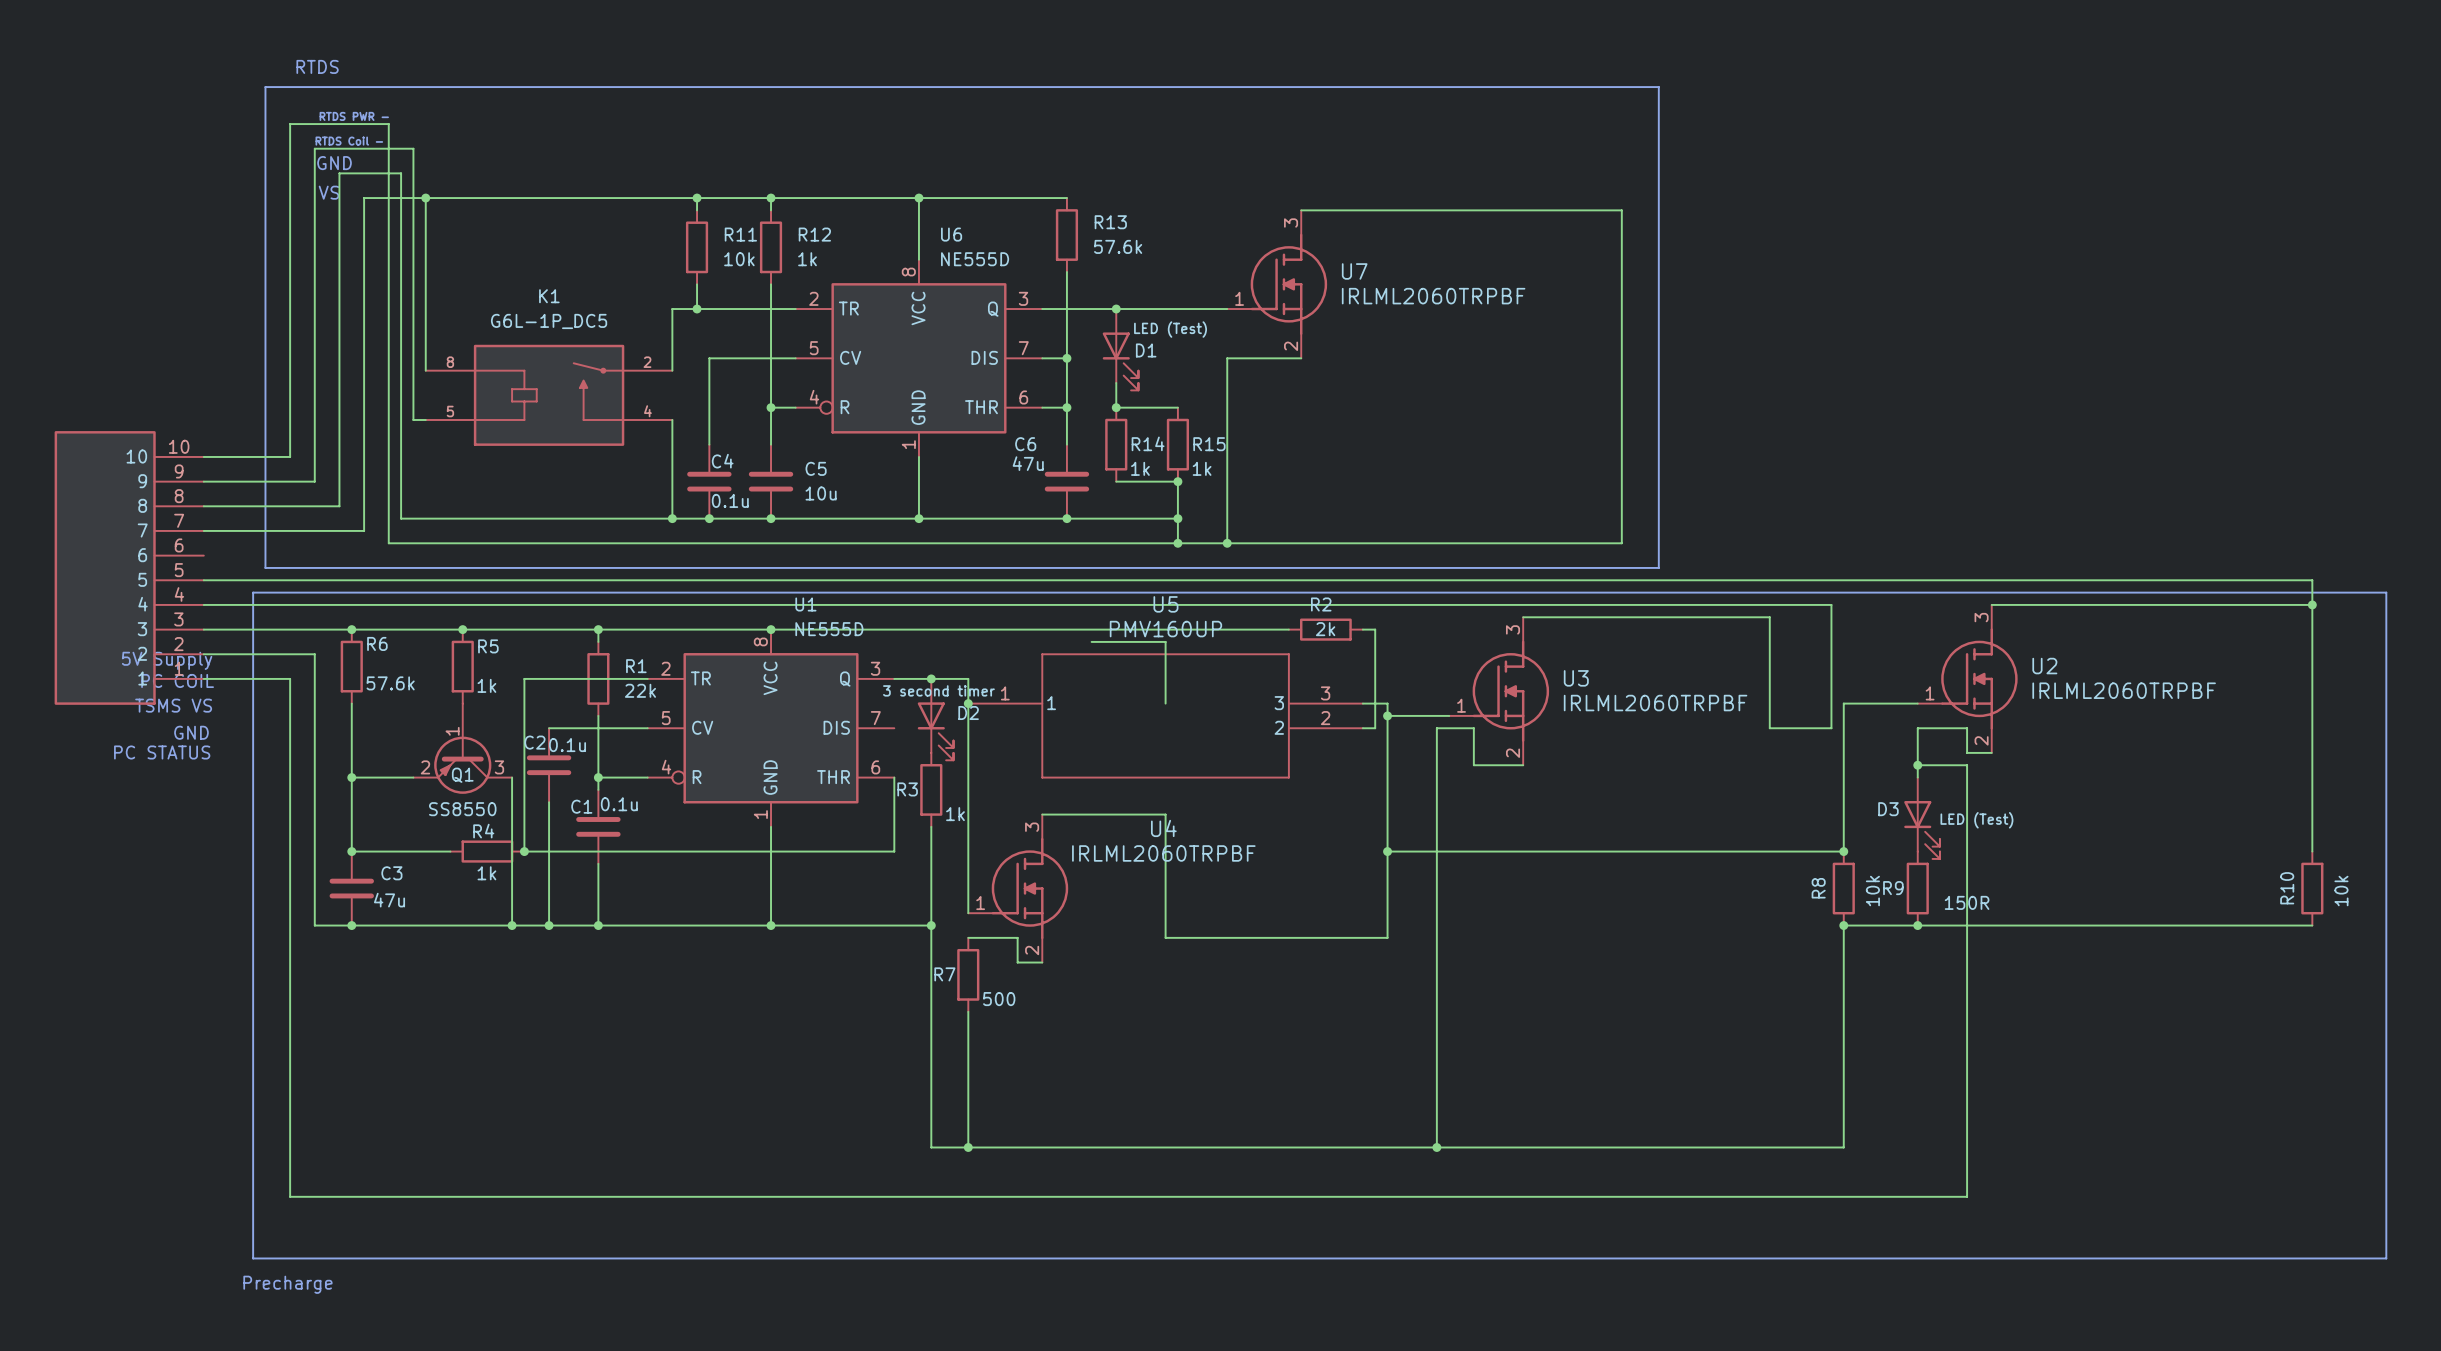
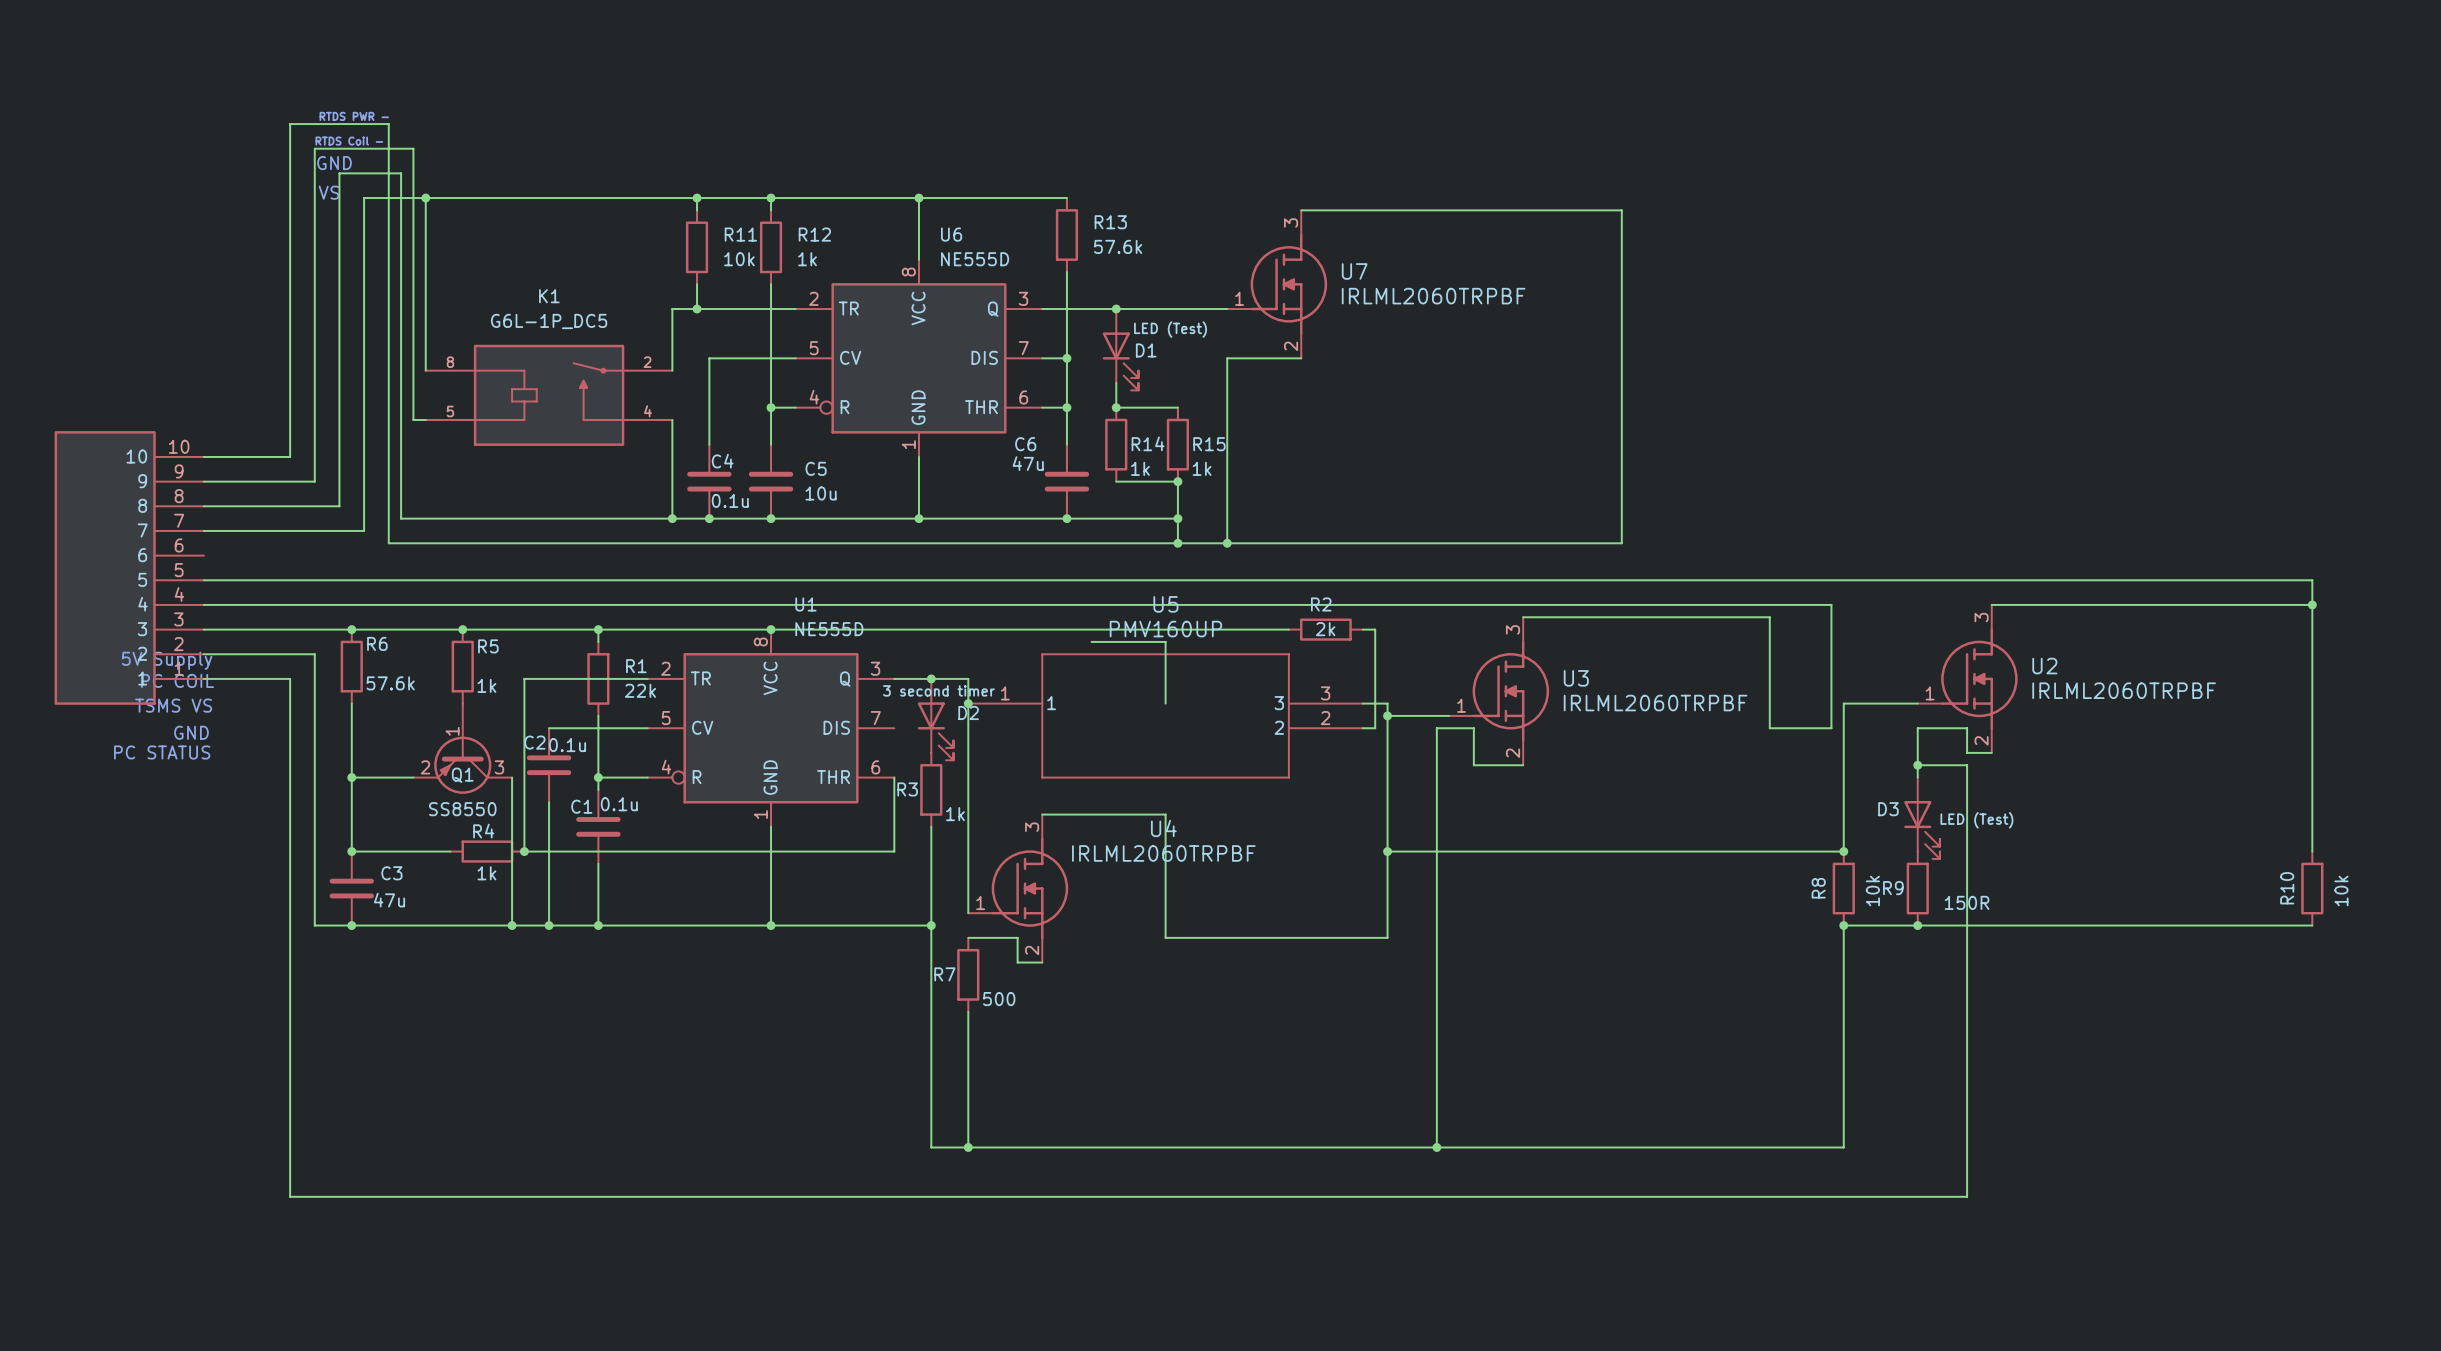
text: RTDS (317, 66) -> none
line: (265, 87) (1658, 87) (1658, 567) (265, 567) (265, 87) -> none
line: (253, 592) (2386, 592) (2386, 1258) (253, 1258) (253, 592) -> none
text: Precharge (287, 1284) -> none

